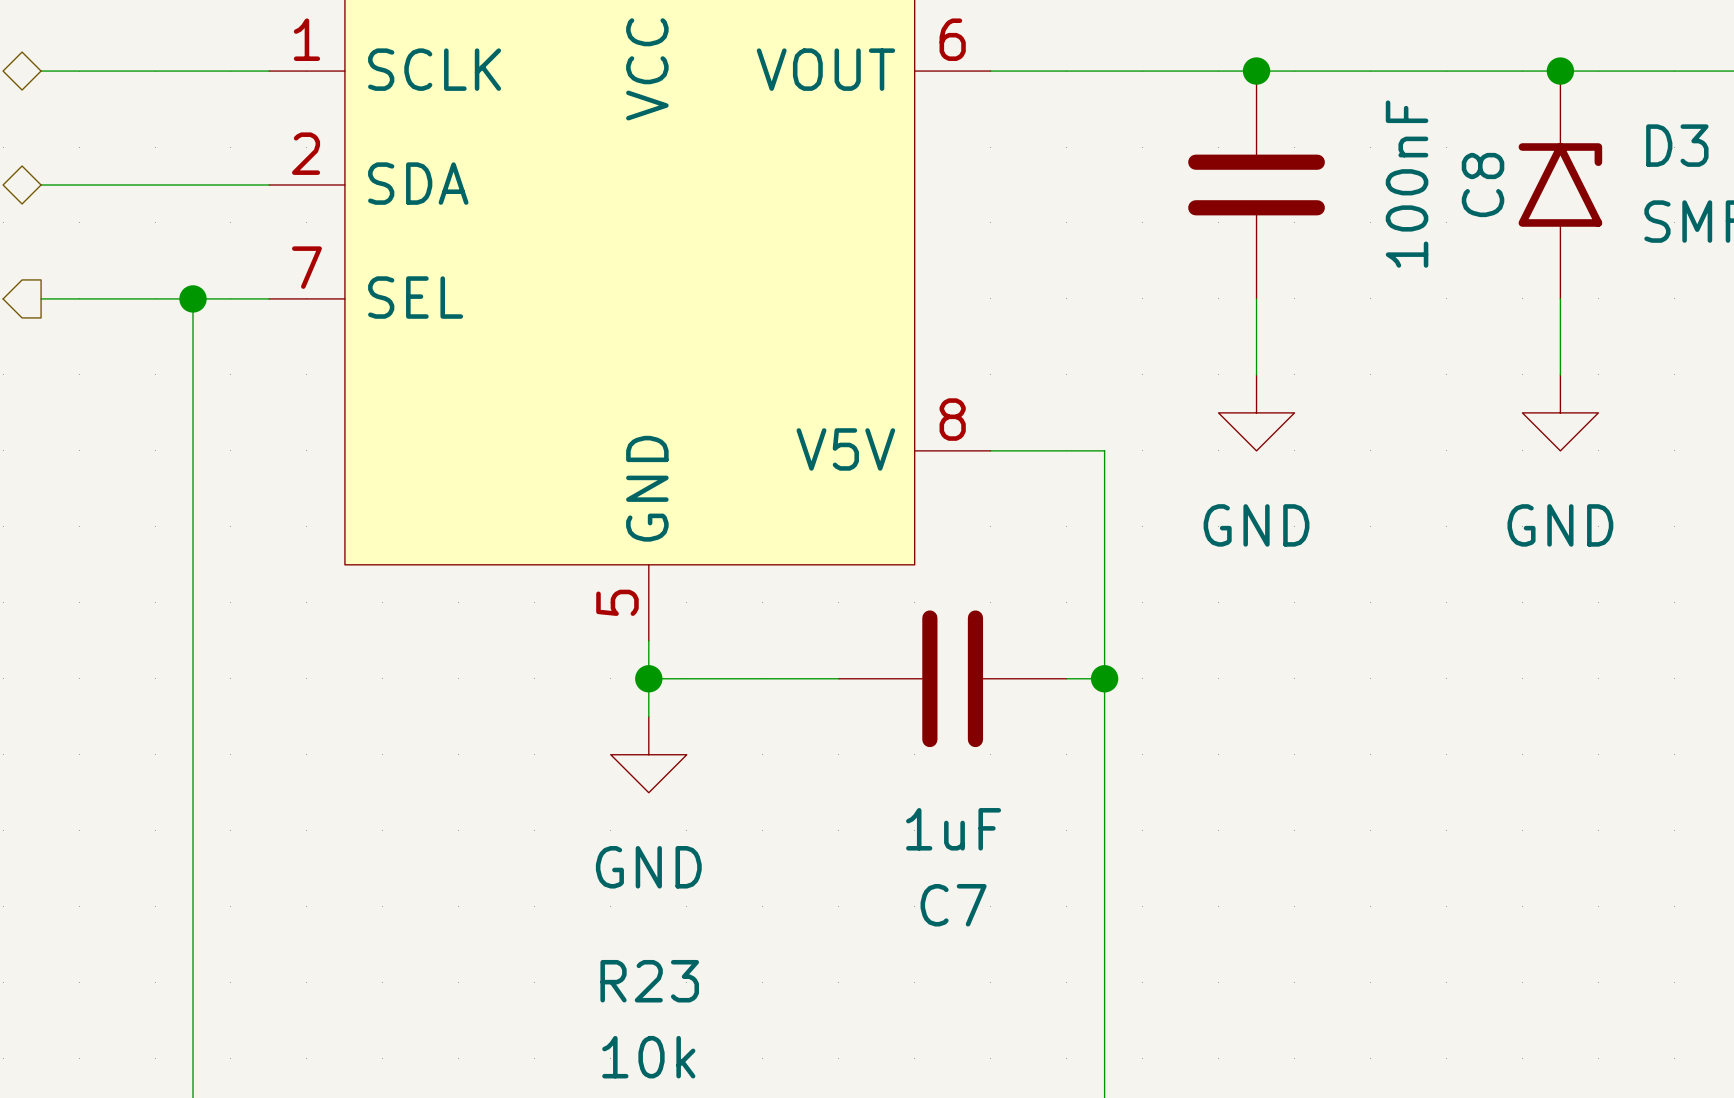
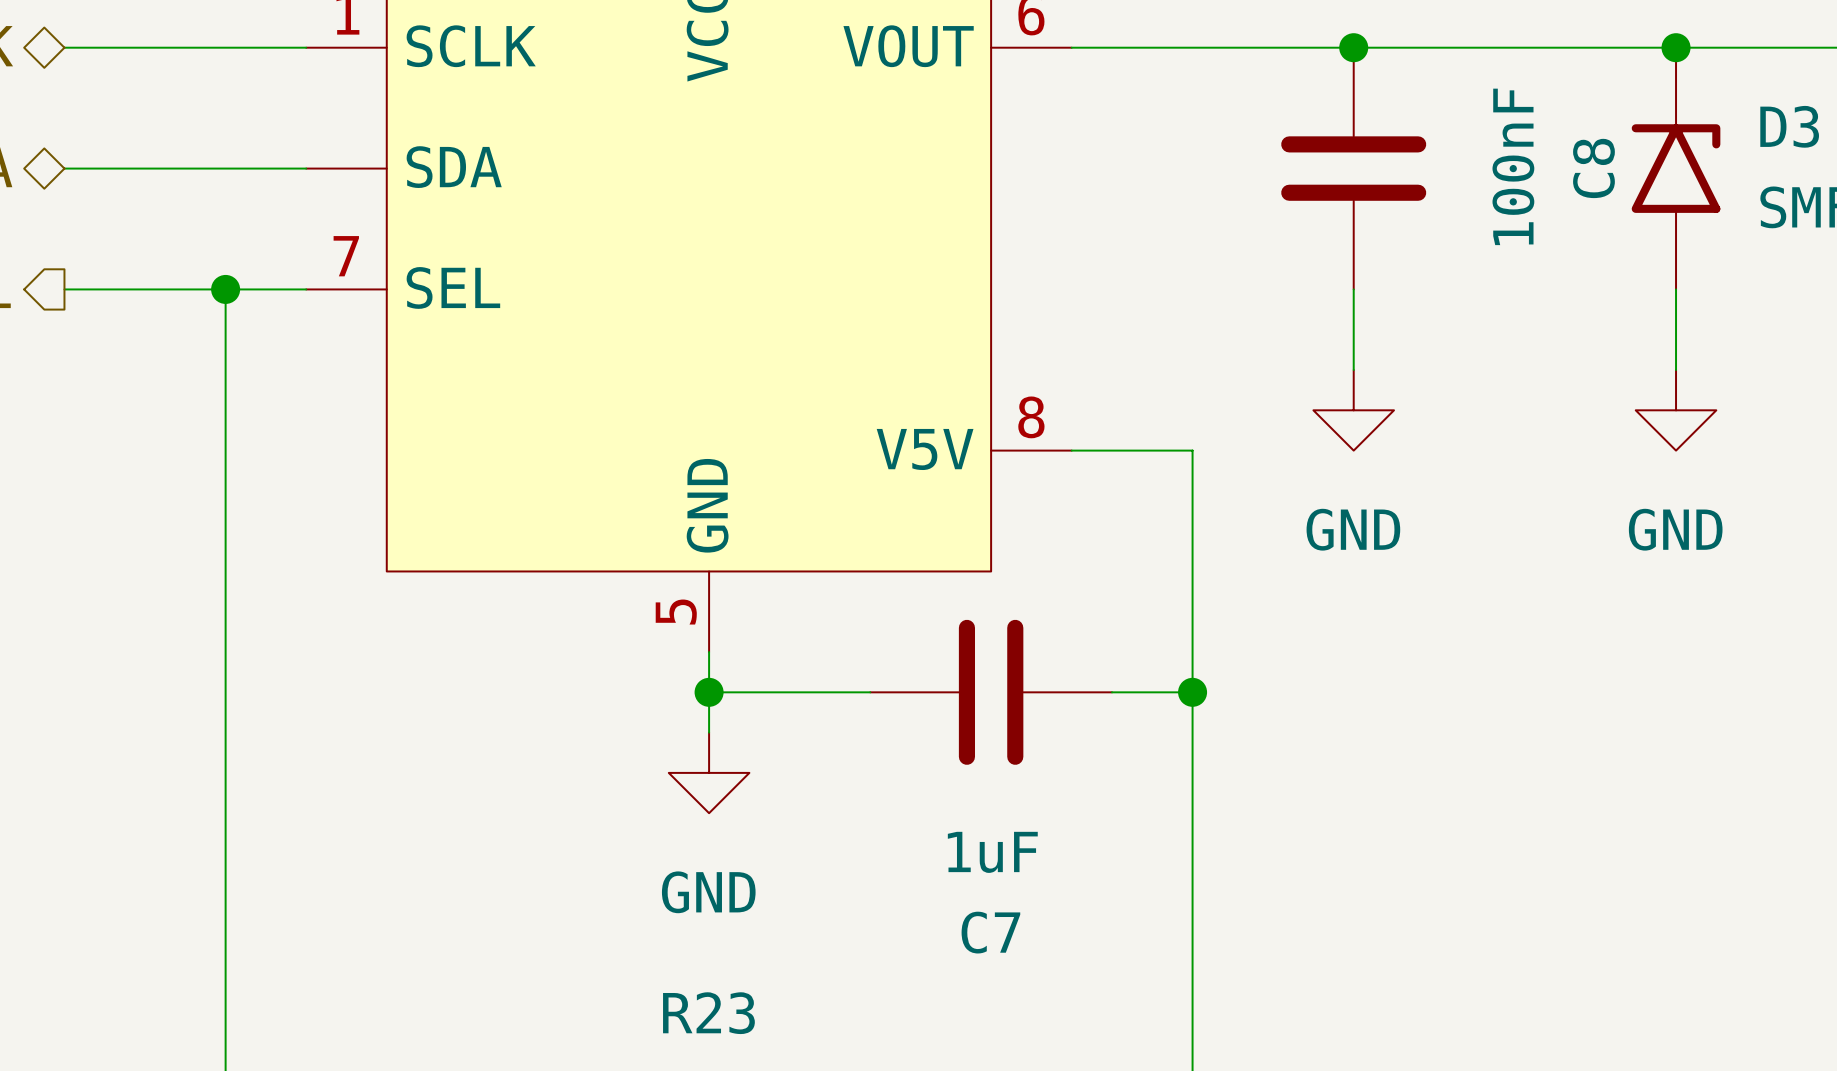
part pin number: 2 (306, 153) -> none
C7 position: (952, 678) -> (991, 692)

